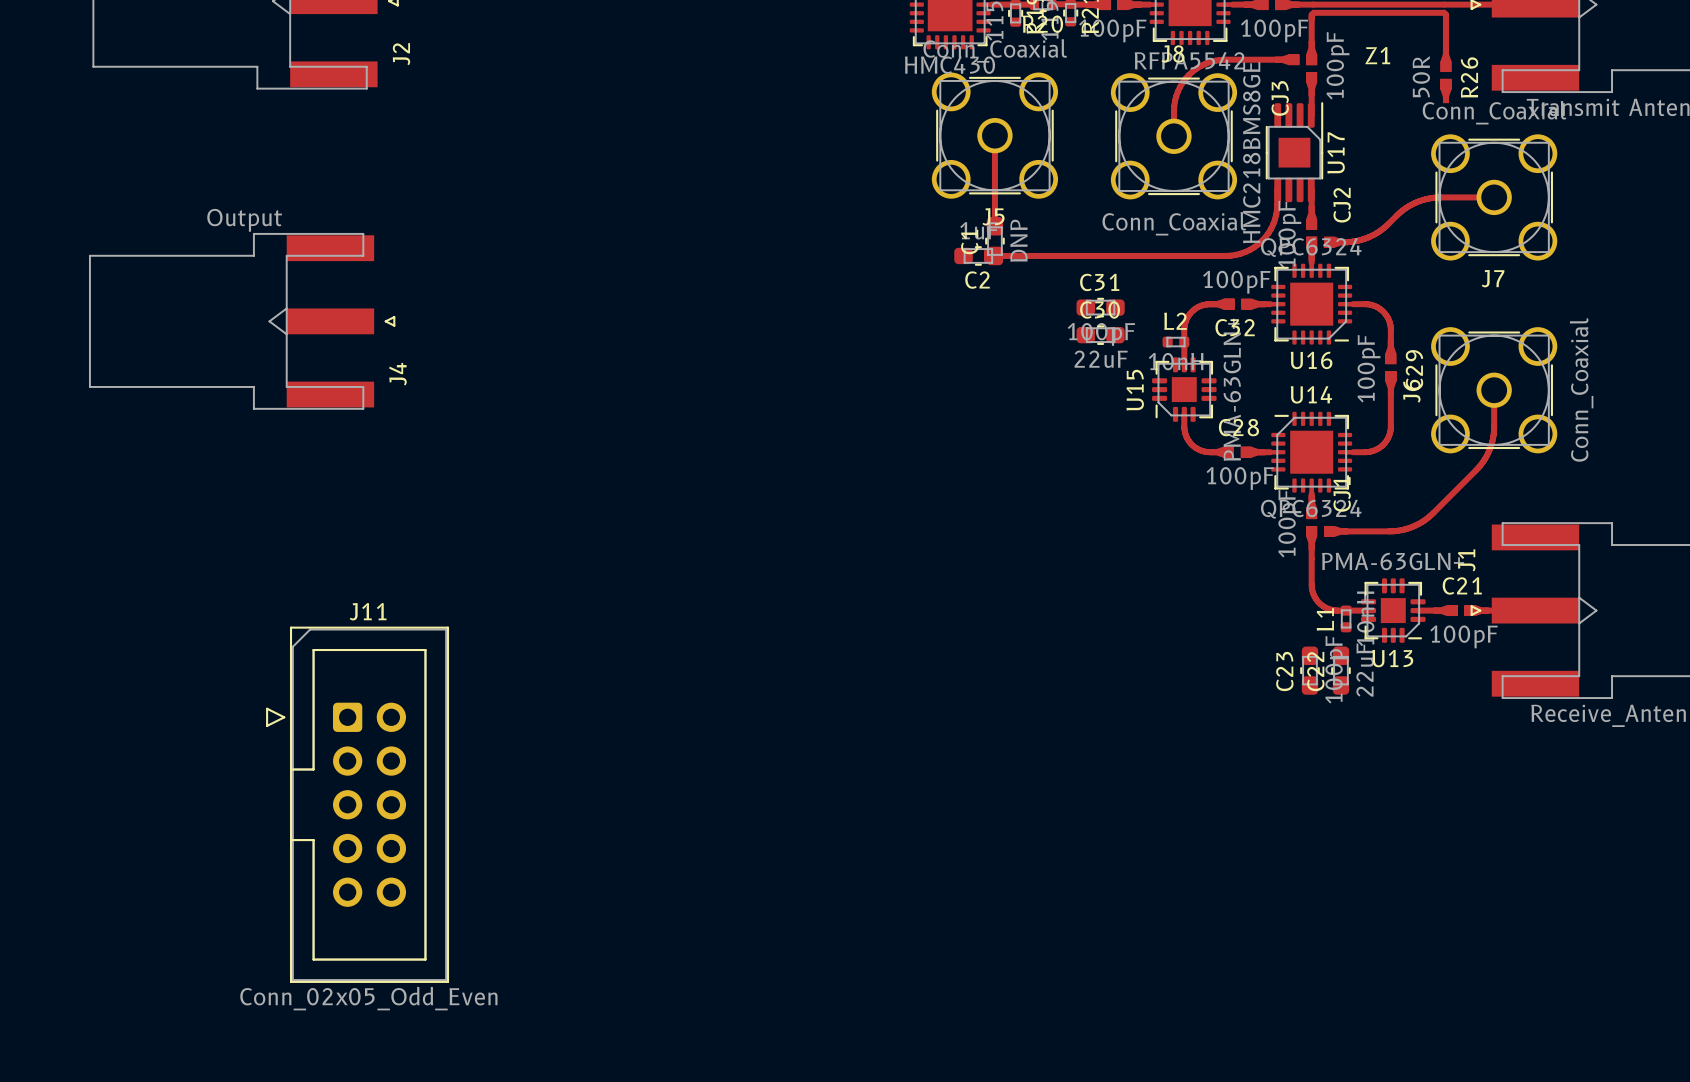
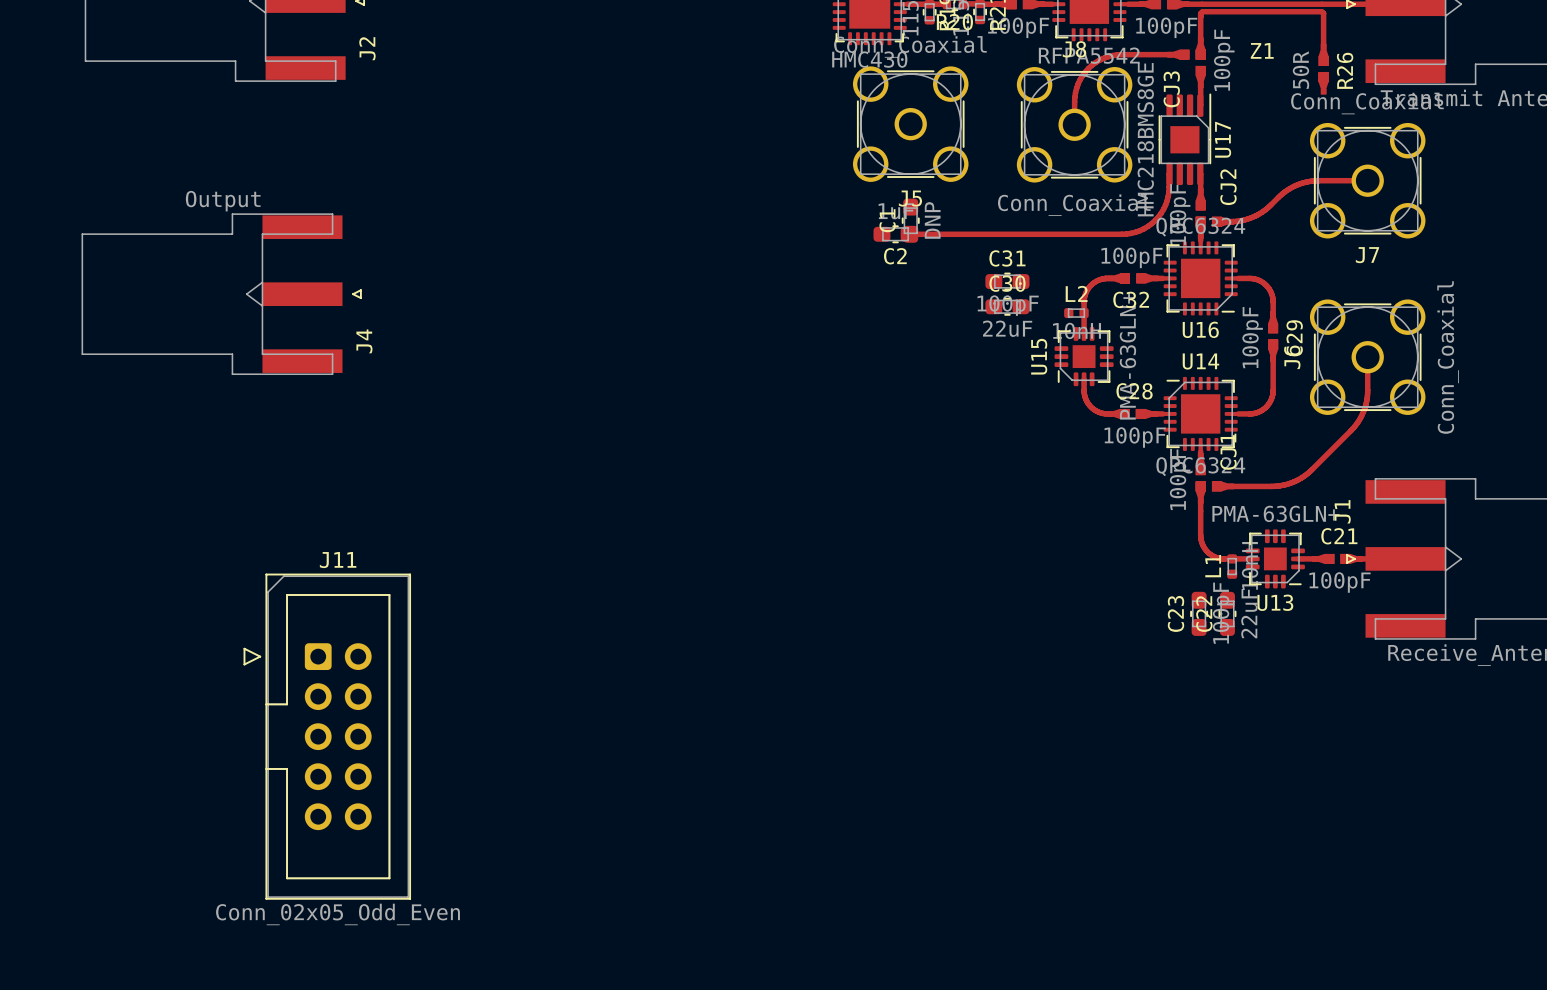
track: (994, 135) (994, 226) -> none

